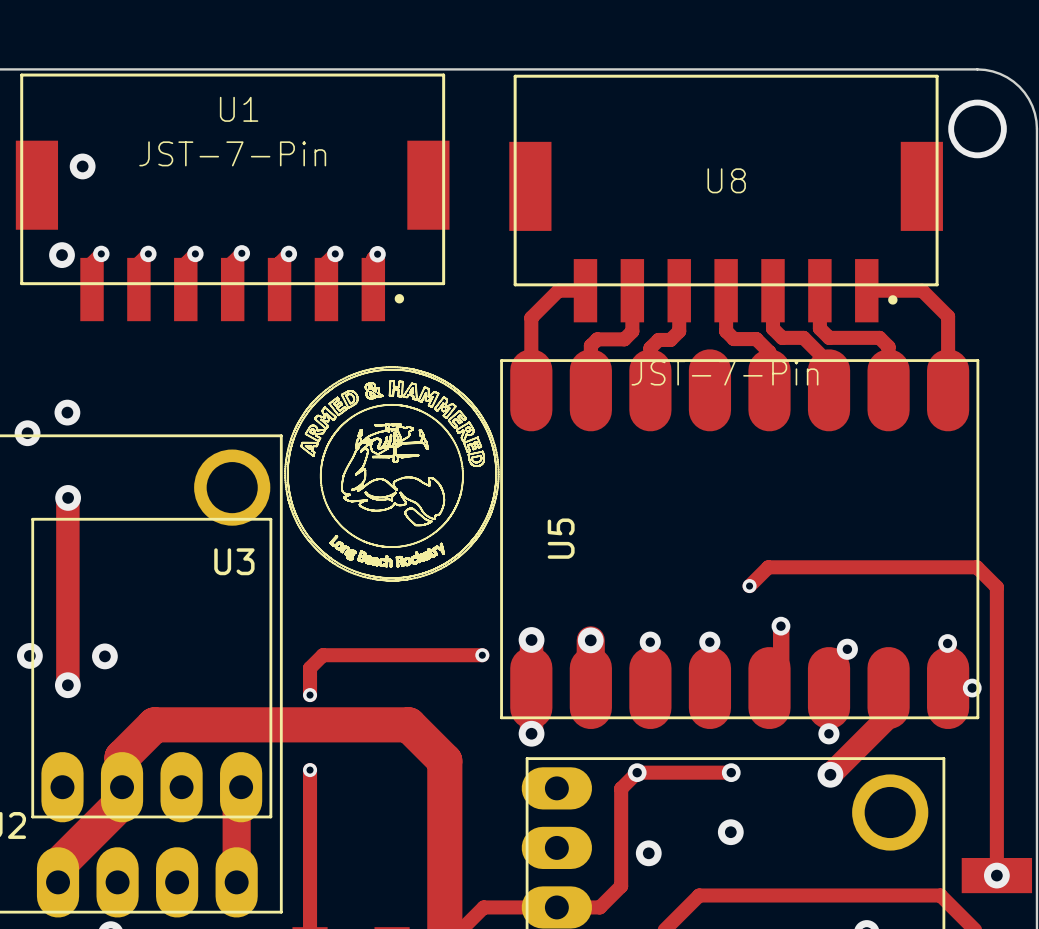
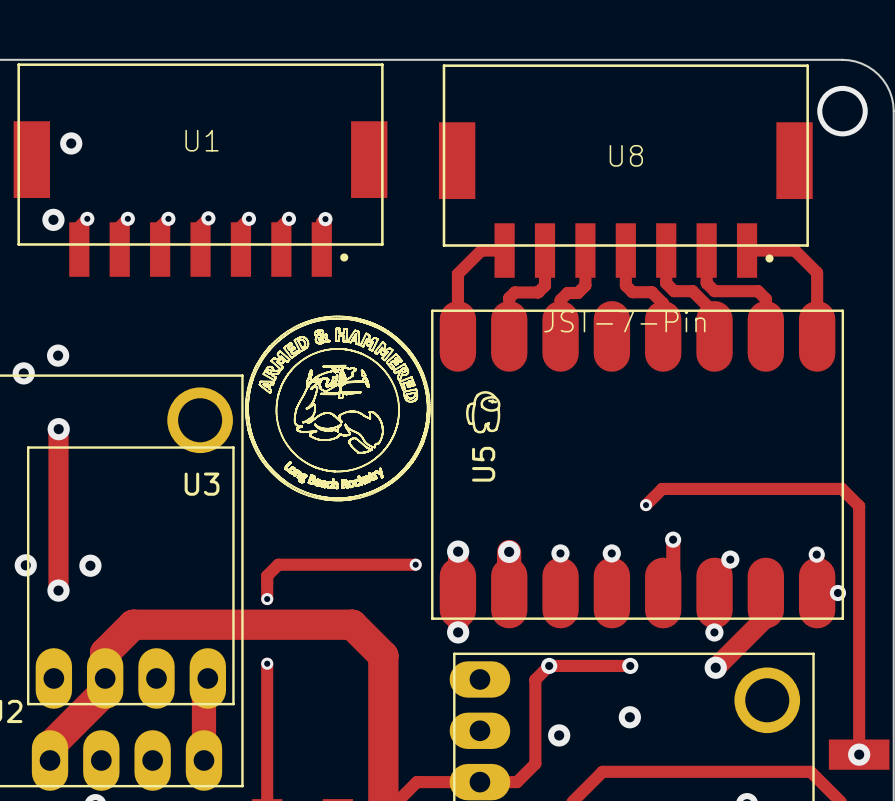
U1 name position: U1 (239, 109) -> U1 (202, 140)
U1 value: JST-7-Pin (232, 153) -> none
line: none -> (495, 397) (488, 392) (481, 392) (476, 396) (474, 404)
line: none -> (495, 397) (484, 399) (481, 405) (488, 410) (498, 408)
line: none -> (495, 397) (498, 402) (498, 408)
line: none -> (492, 400) (492, 402)
line: none -> (489, 400) (495, 402)
line: none -> (474, 404) (468, 406) (467, 417) (469, 423) (473, 423) (475, 430) (478, 432) (483, 431) (485, 424) (488, 423) (489, 430) (496, 429) (498, 418) (498, 408)
line: none -> (474, 404) (473, 423)

